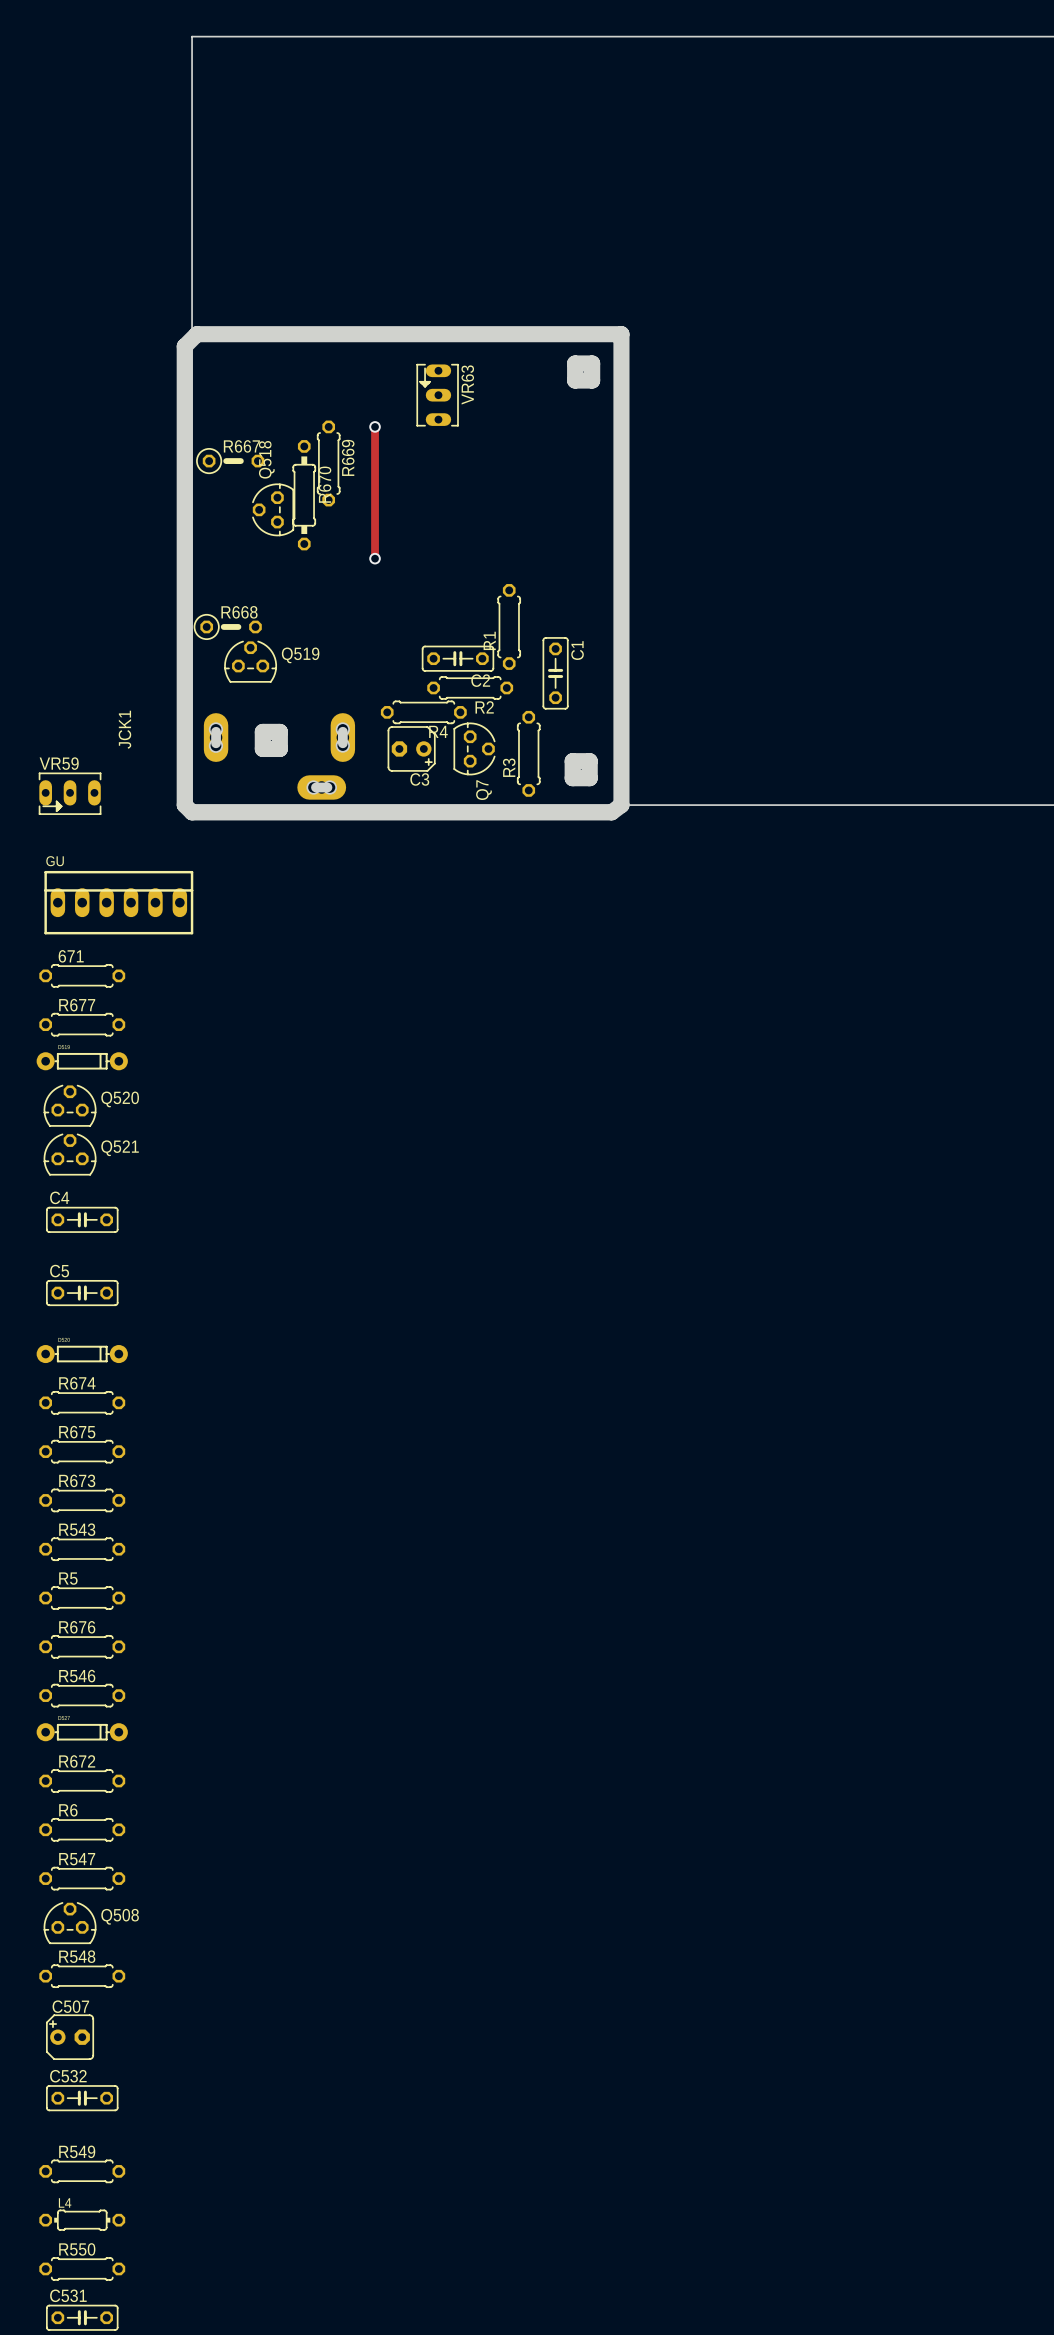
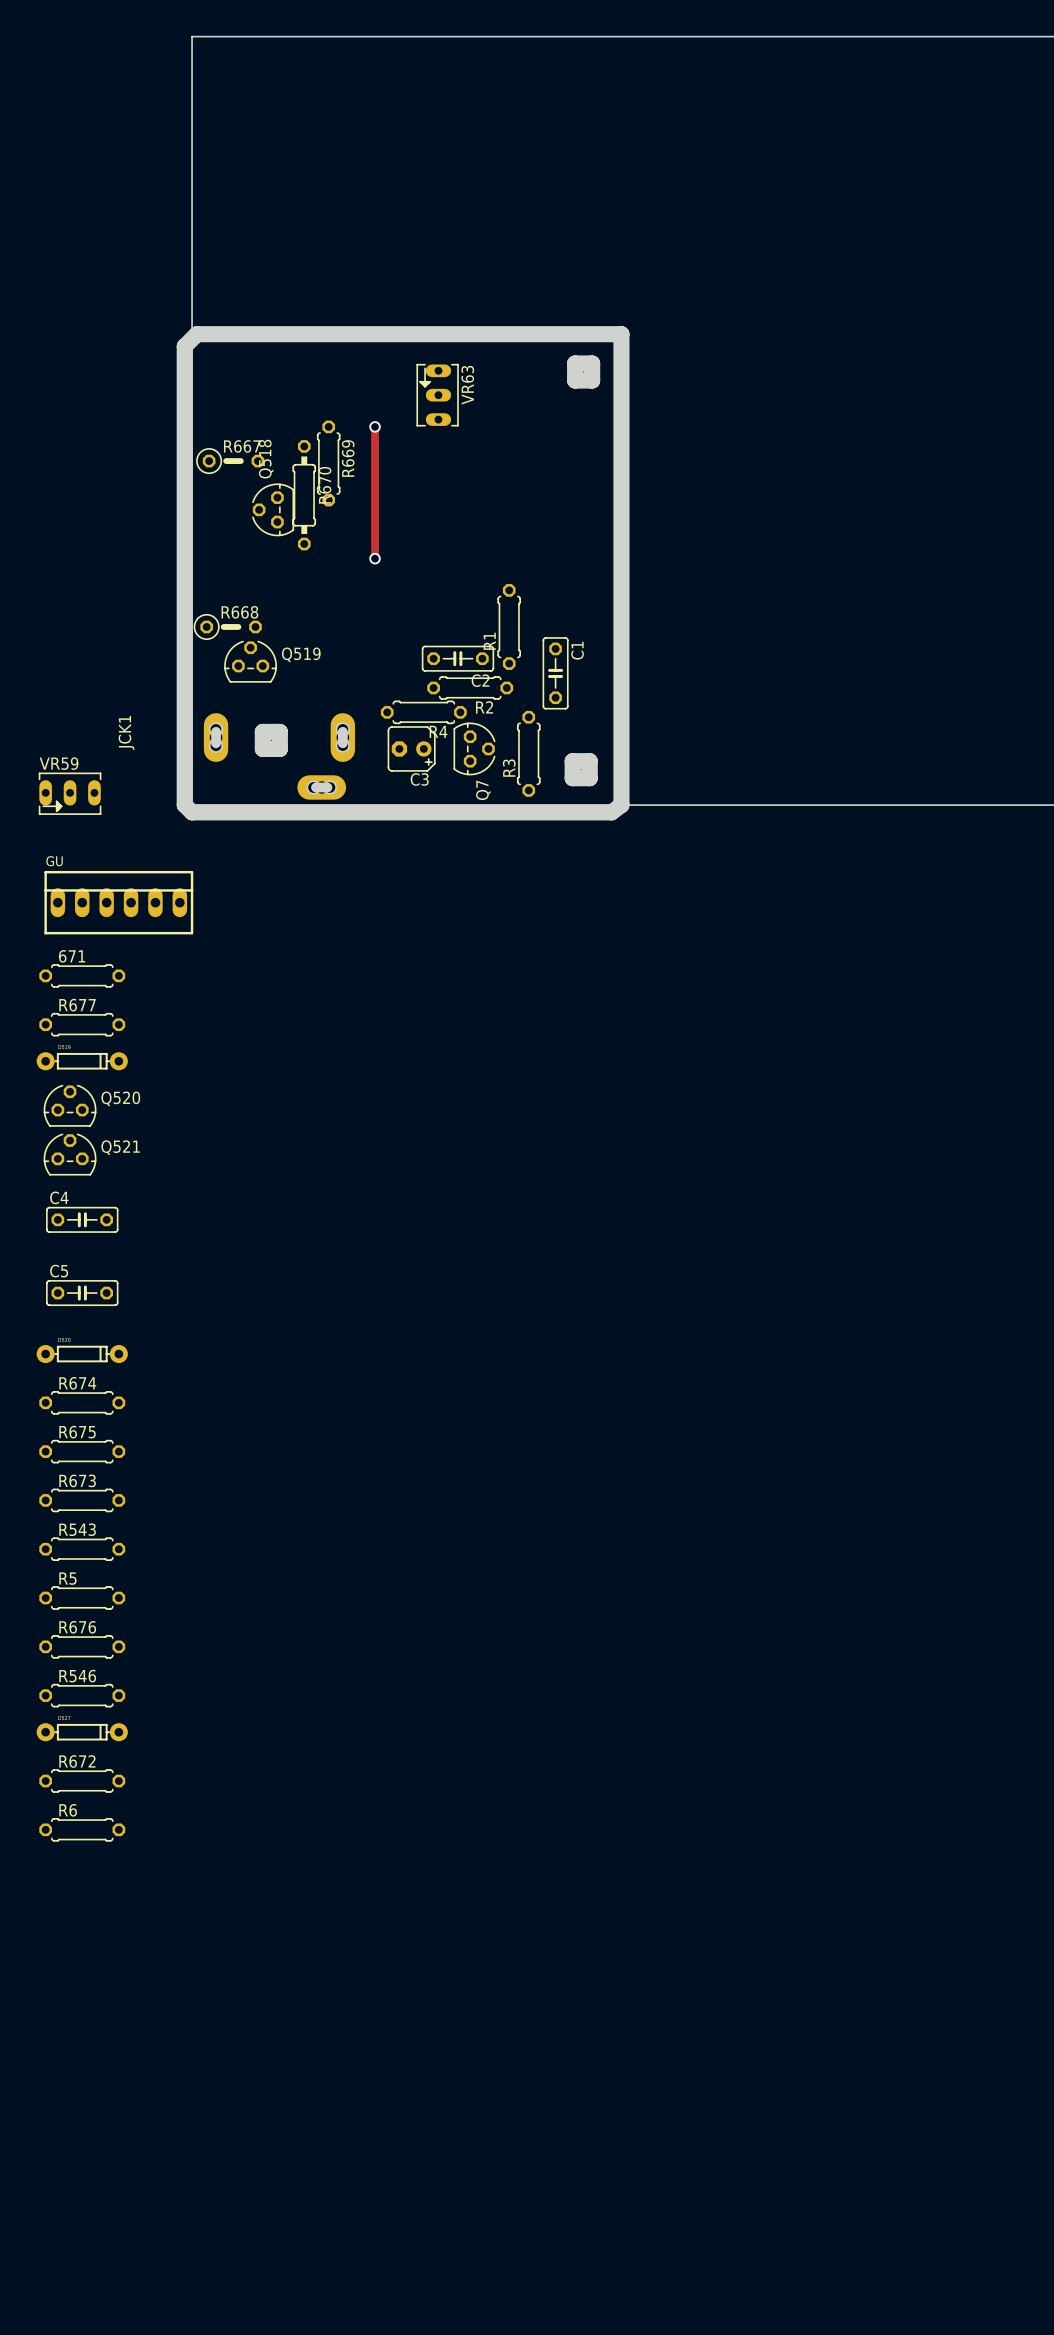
R547: (82, 1878) -> none
Q508: (70, 1923) -> none
R548: (82, 1976) -> none
C507: (70, 2037) -> none
C532: (82, 2098) -> none
R549: (82, 2171) -> none
L4: (82, 2220) -> none
R550: (82, 2268) -> none
C531: (82, 2317) -> none

